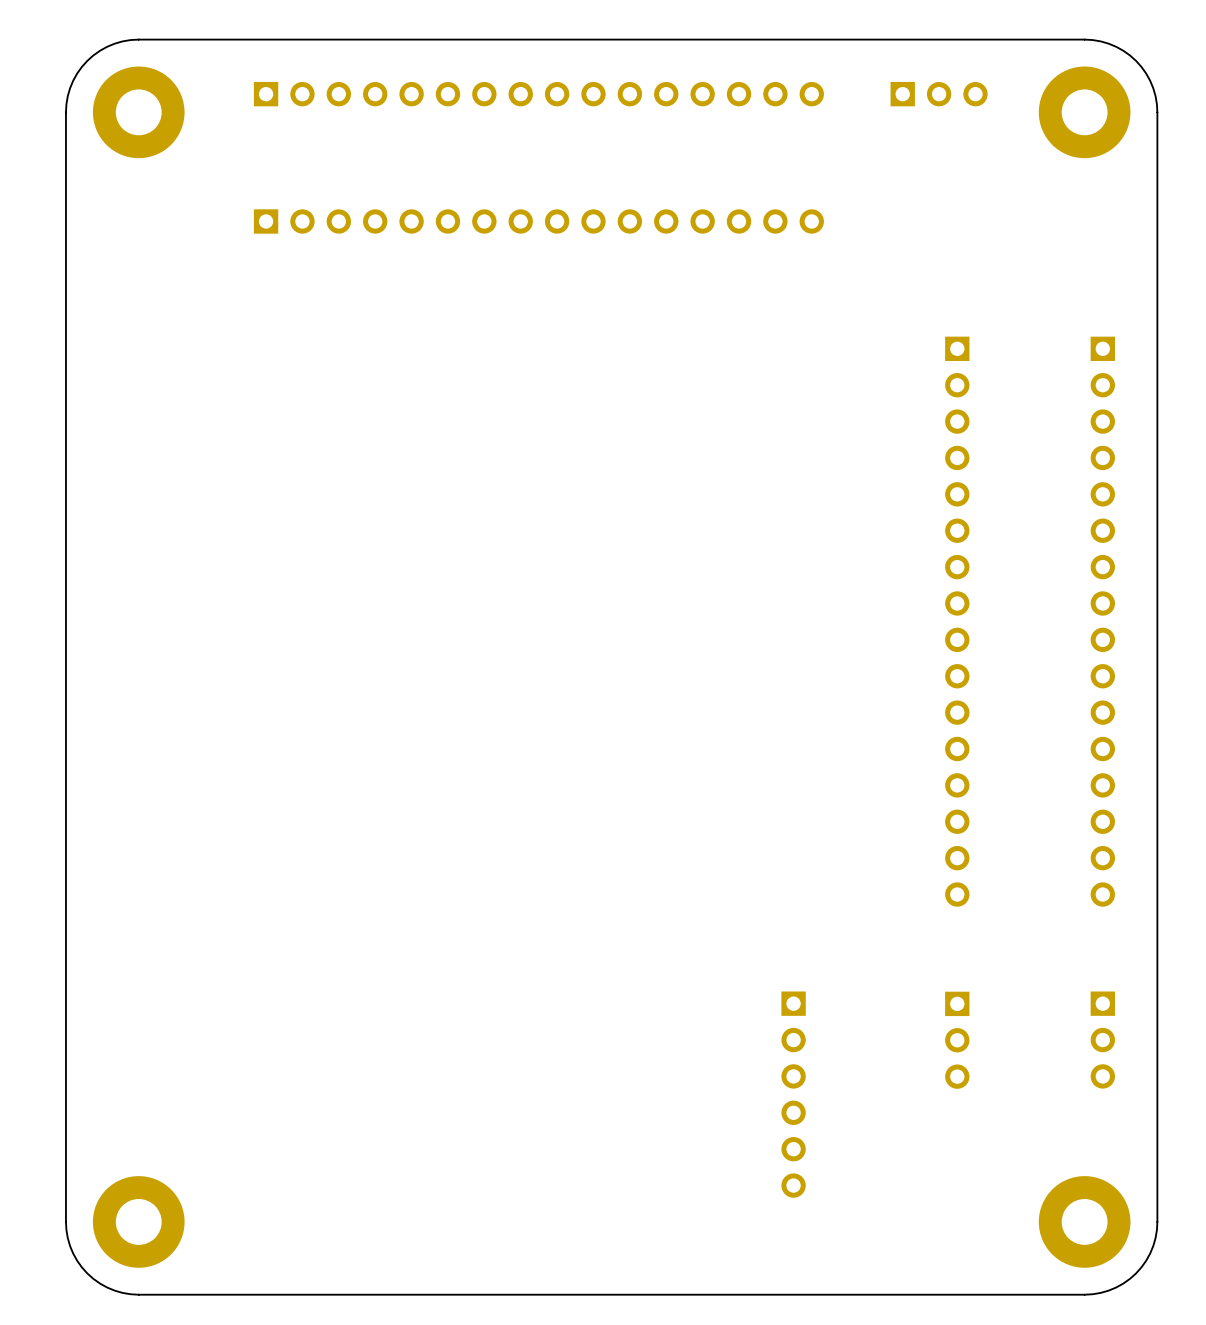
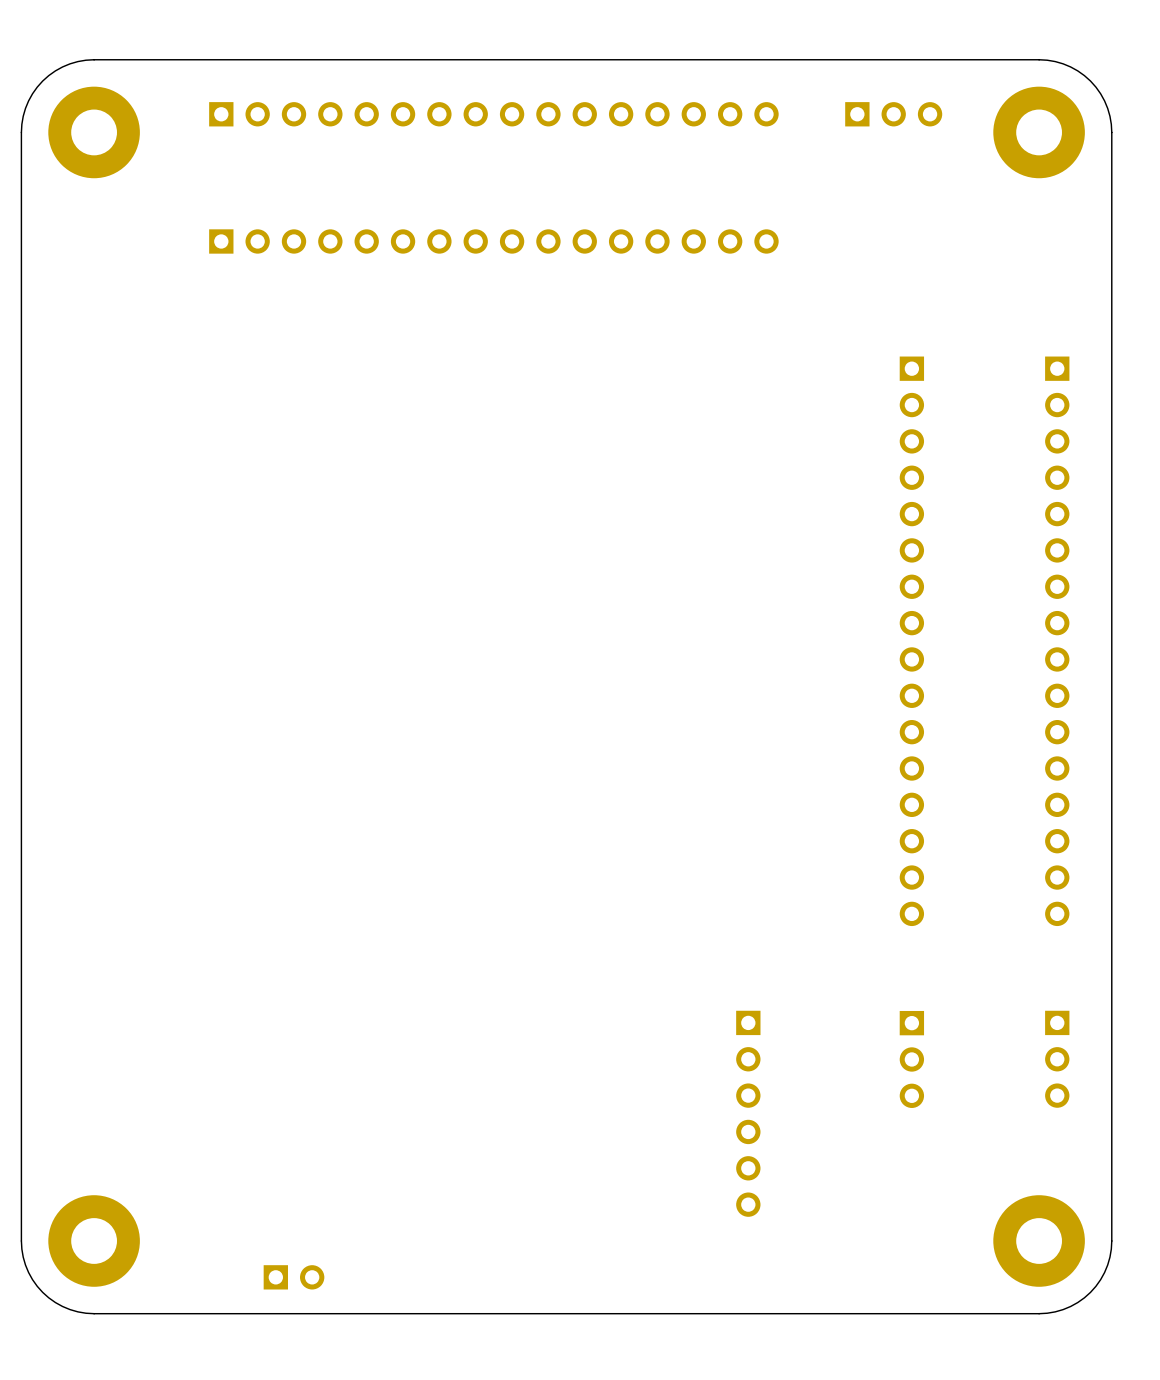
part: none -> (294, 1277)

